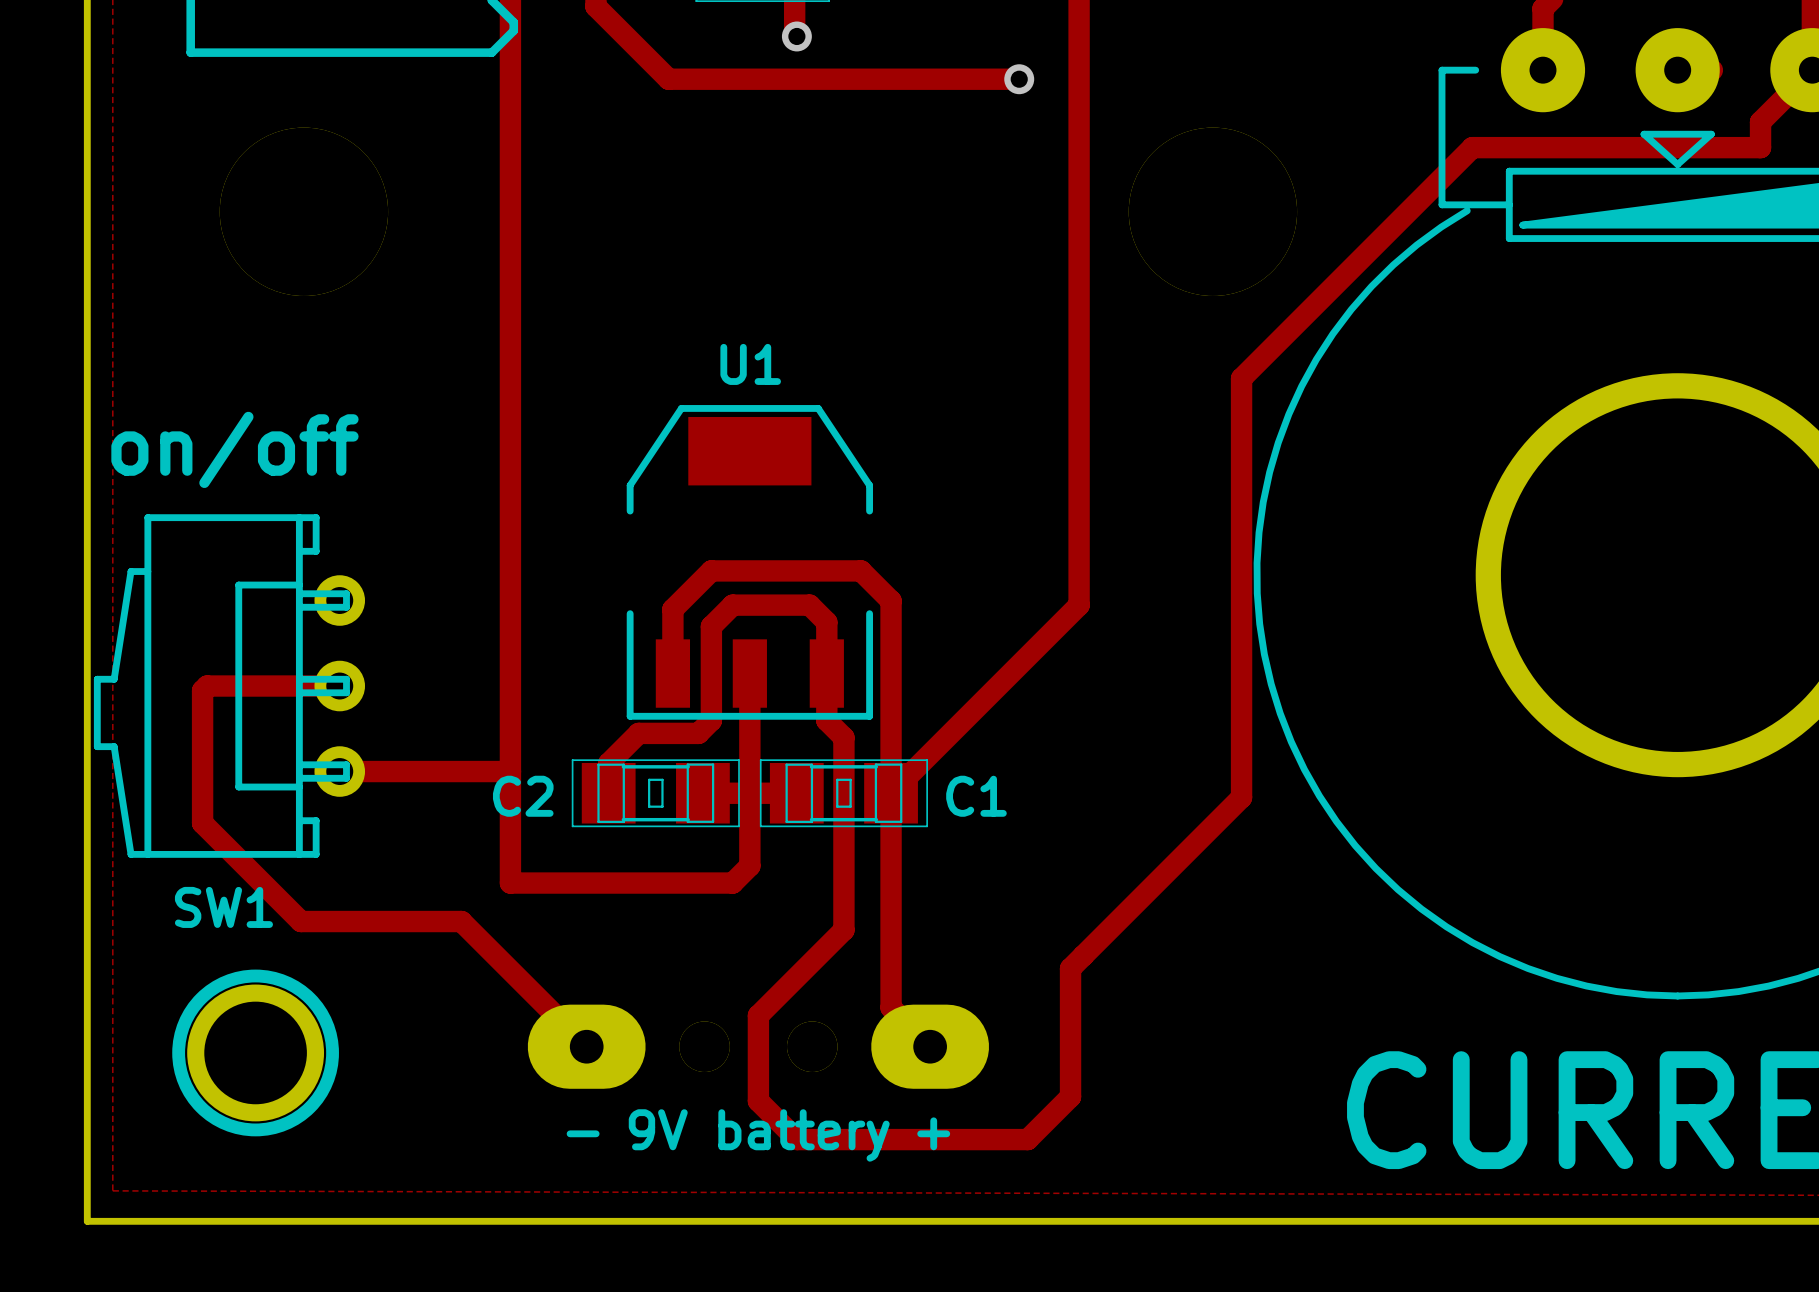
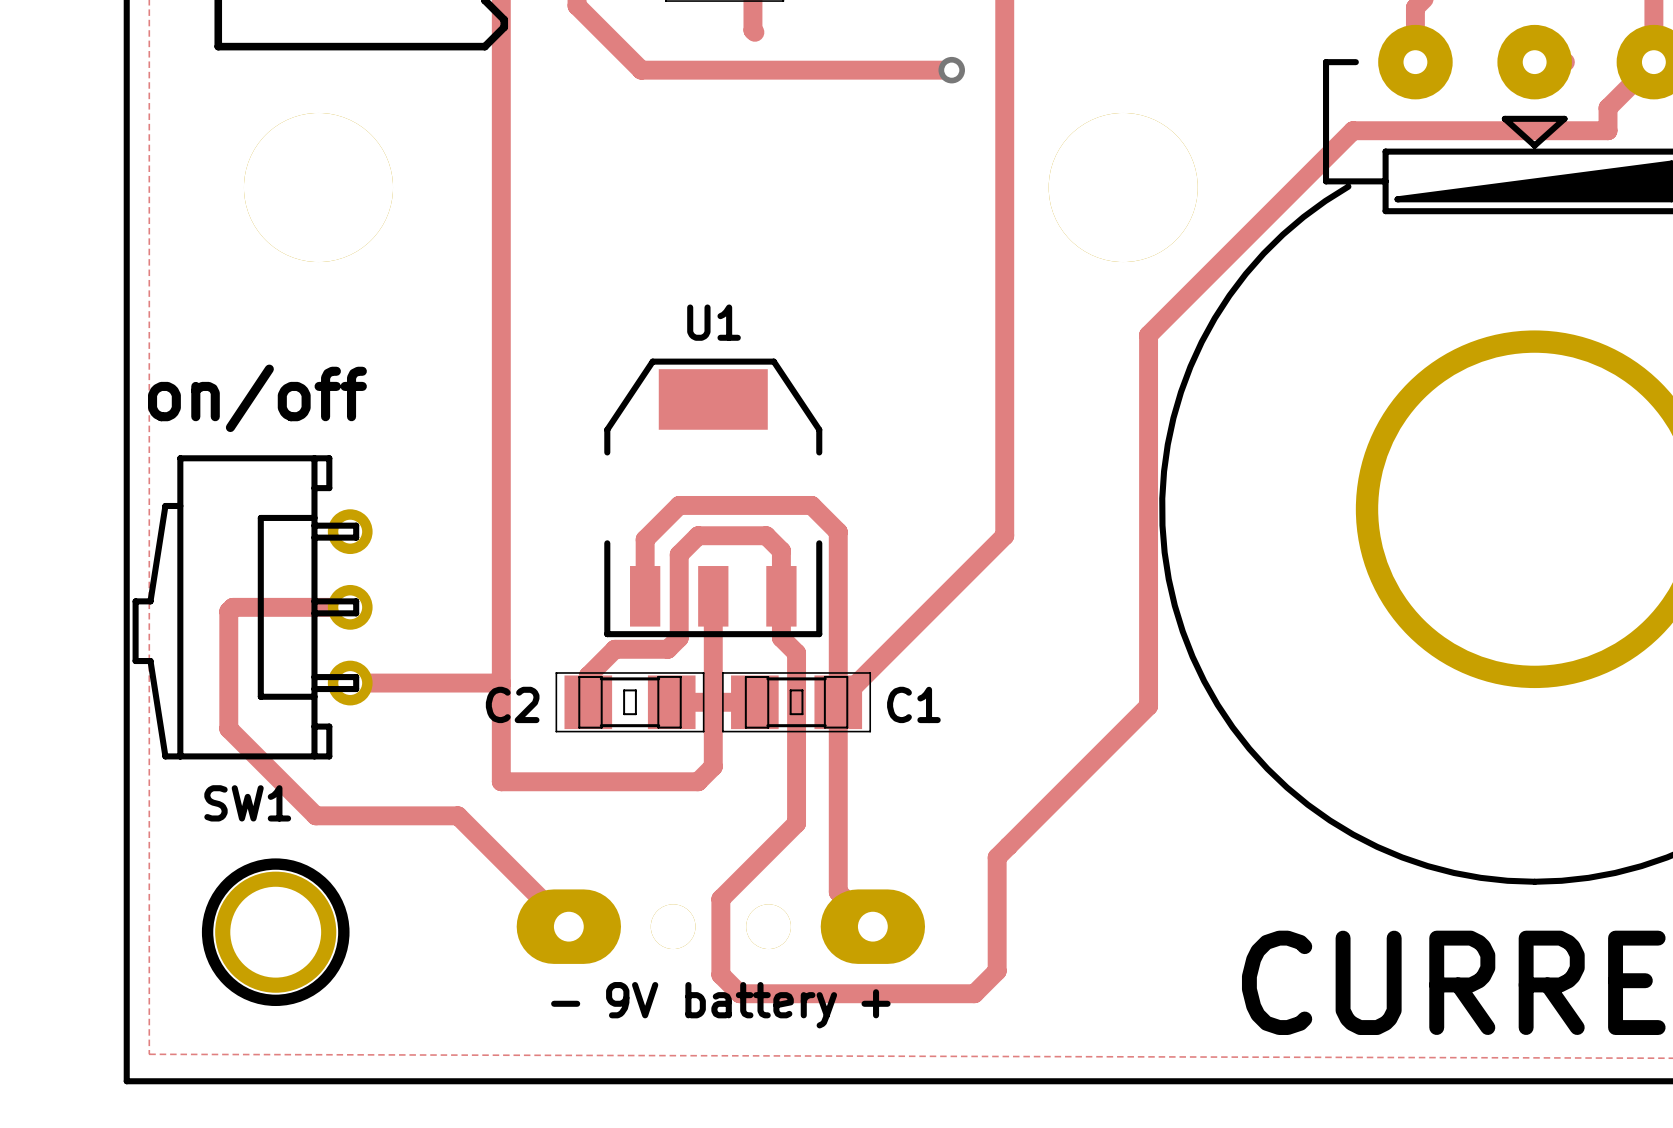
via: (796, 36) -> none
track: (779, 1122) (796, 1139) (1027, 1139) (1044, 1122) -> (739, 993) (974, 993)

